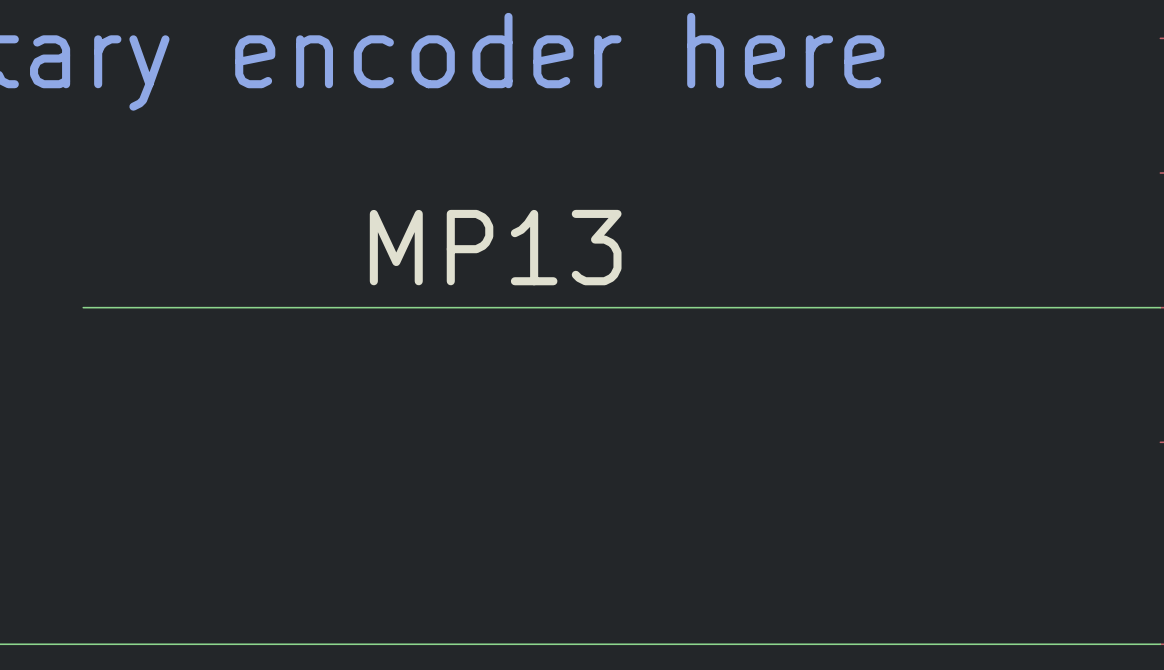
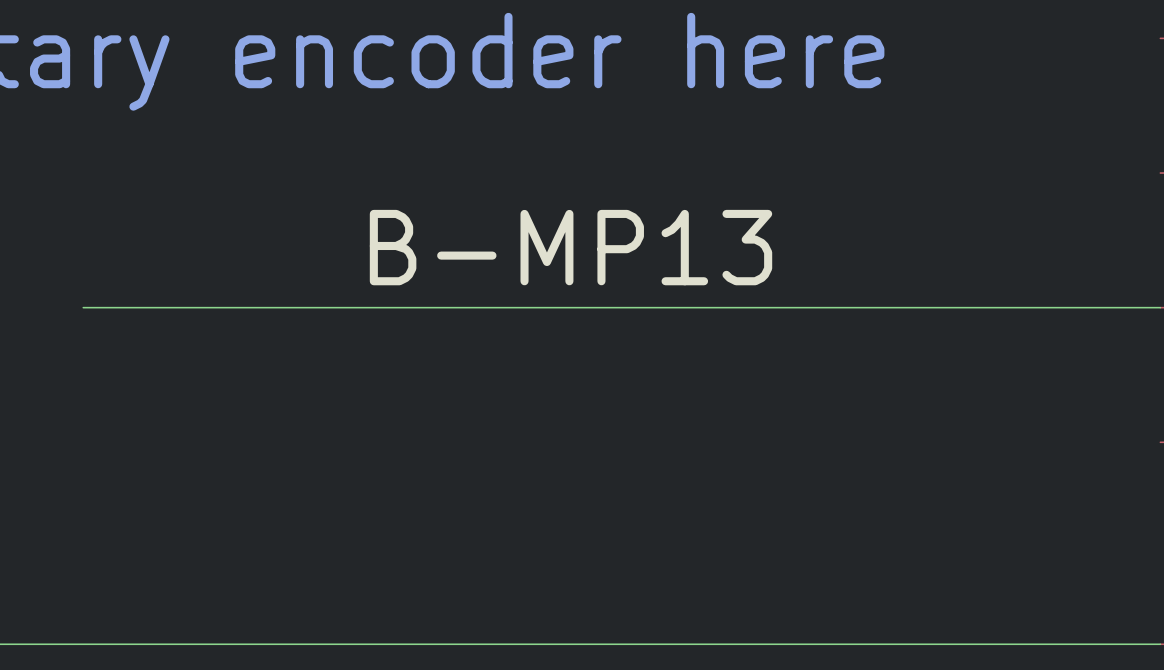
label: MP13 (495, 247) -> B-MP13 (571, 247)

